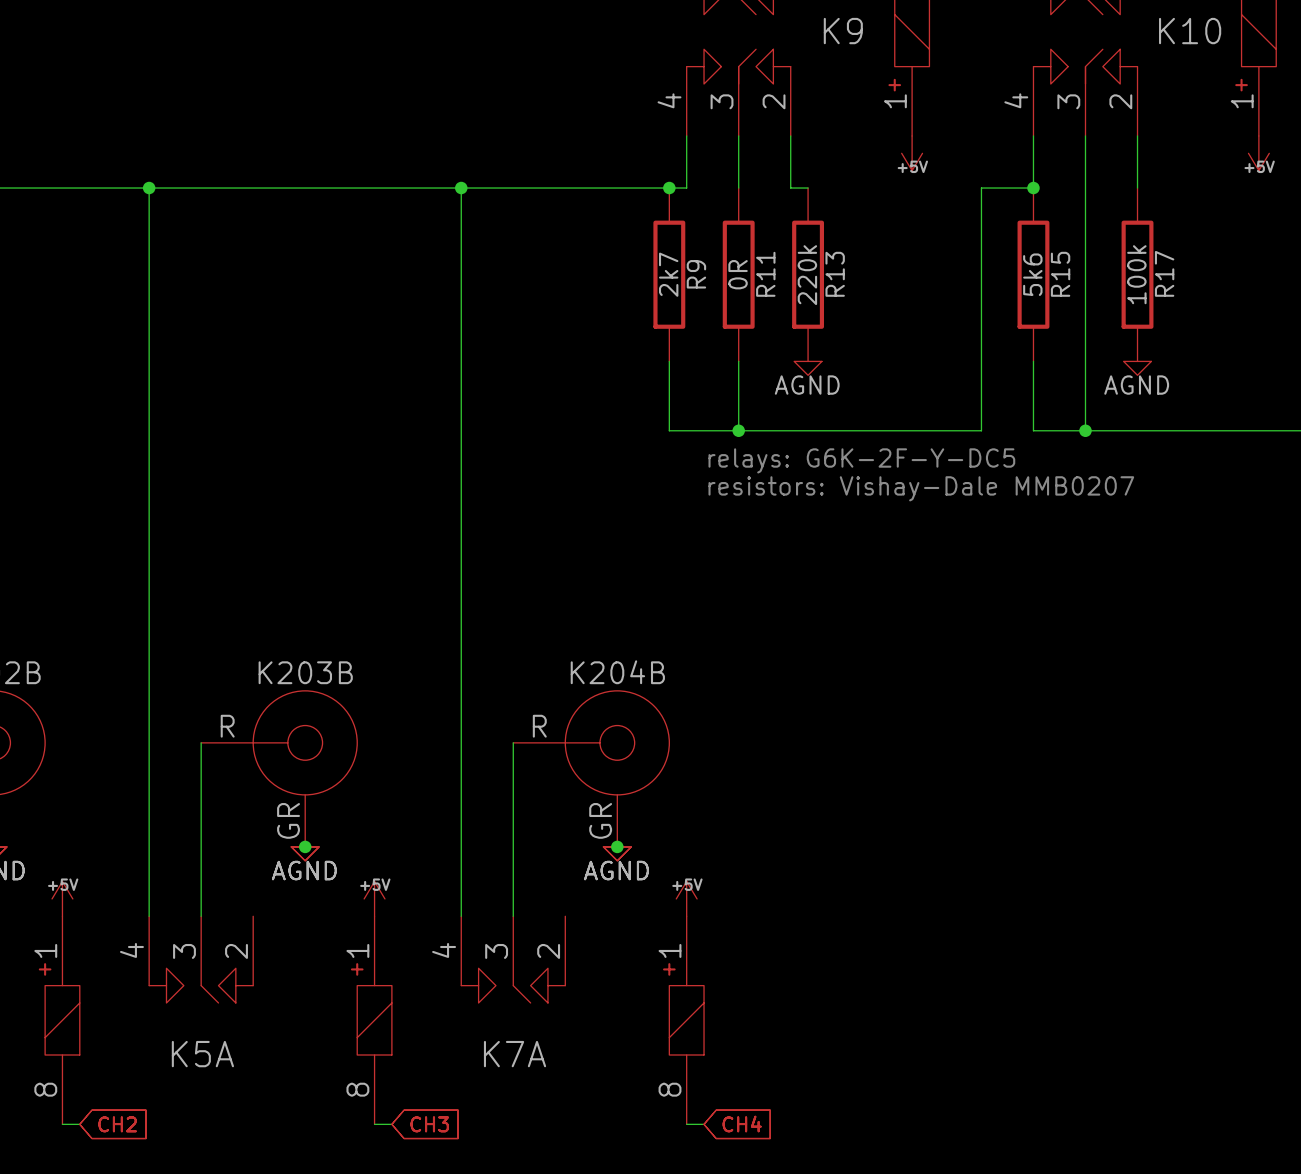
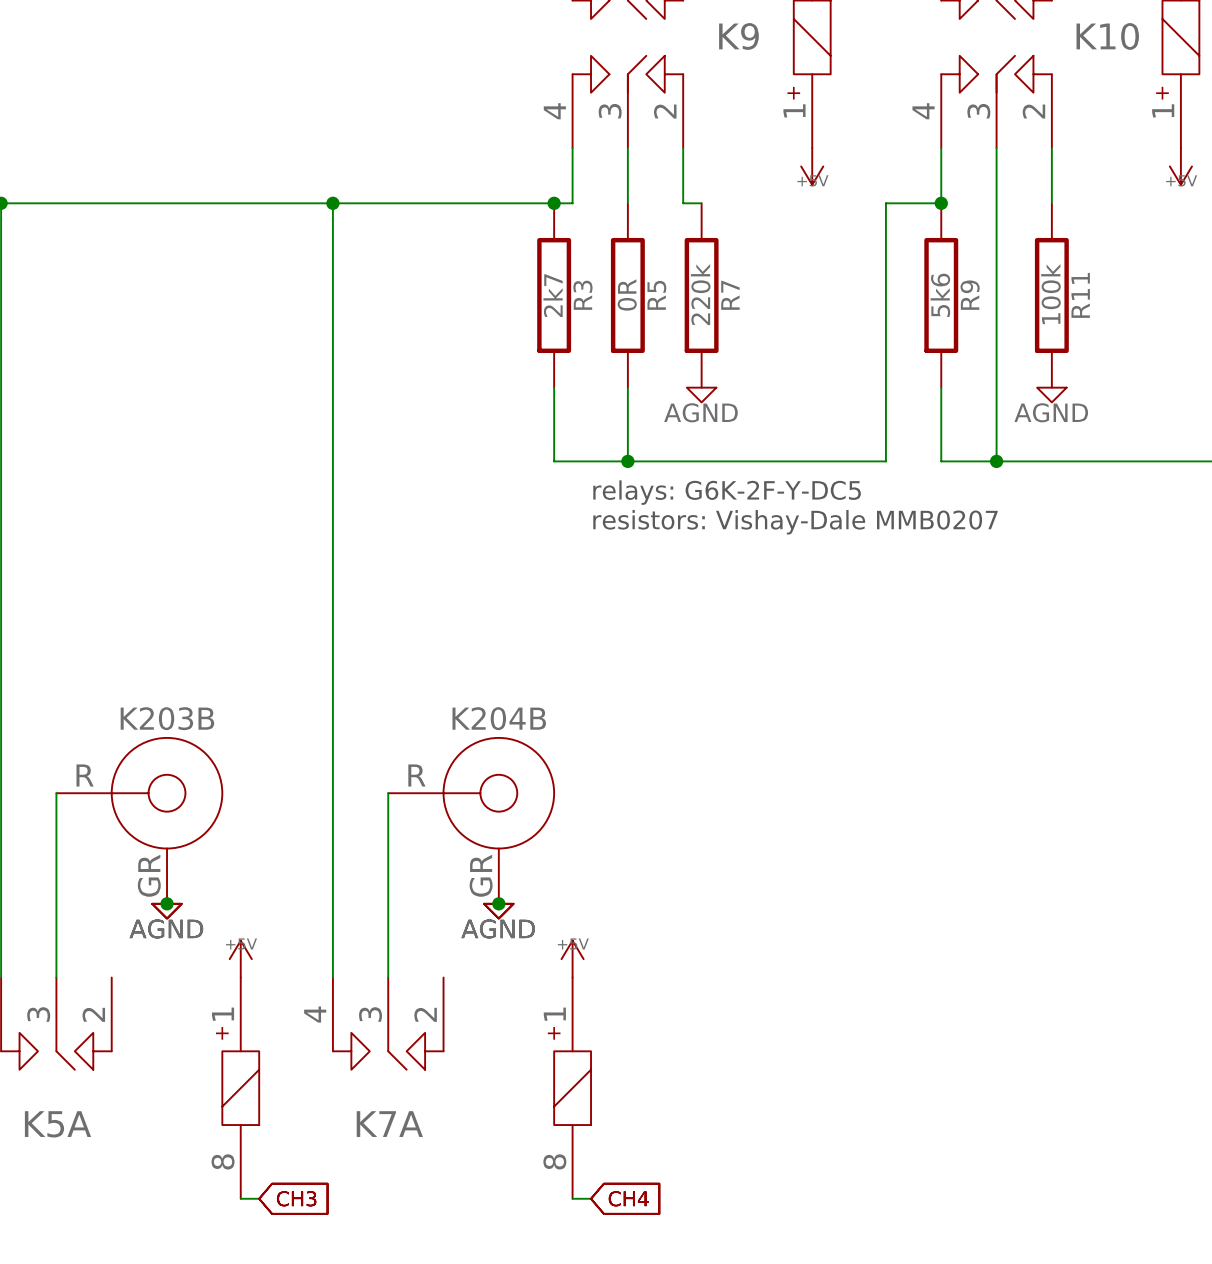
R17 name: R17 (1164, 273) -> R11 (1080, 295)
R9 name: R9 (696, 274) -> R3 (582, 295)
R11 name: R11 (765, 274) -> R5 (656, 295)
R13 name: R13 (835, 274) -> R7 (730, 295)
R15 name: R15 (1060, 274) -> R9 (970, 295)

